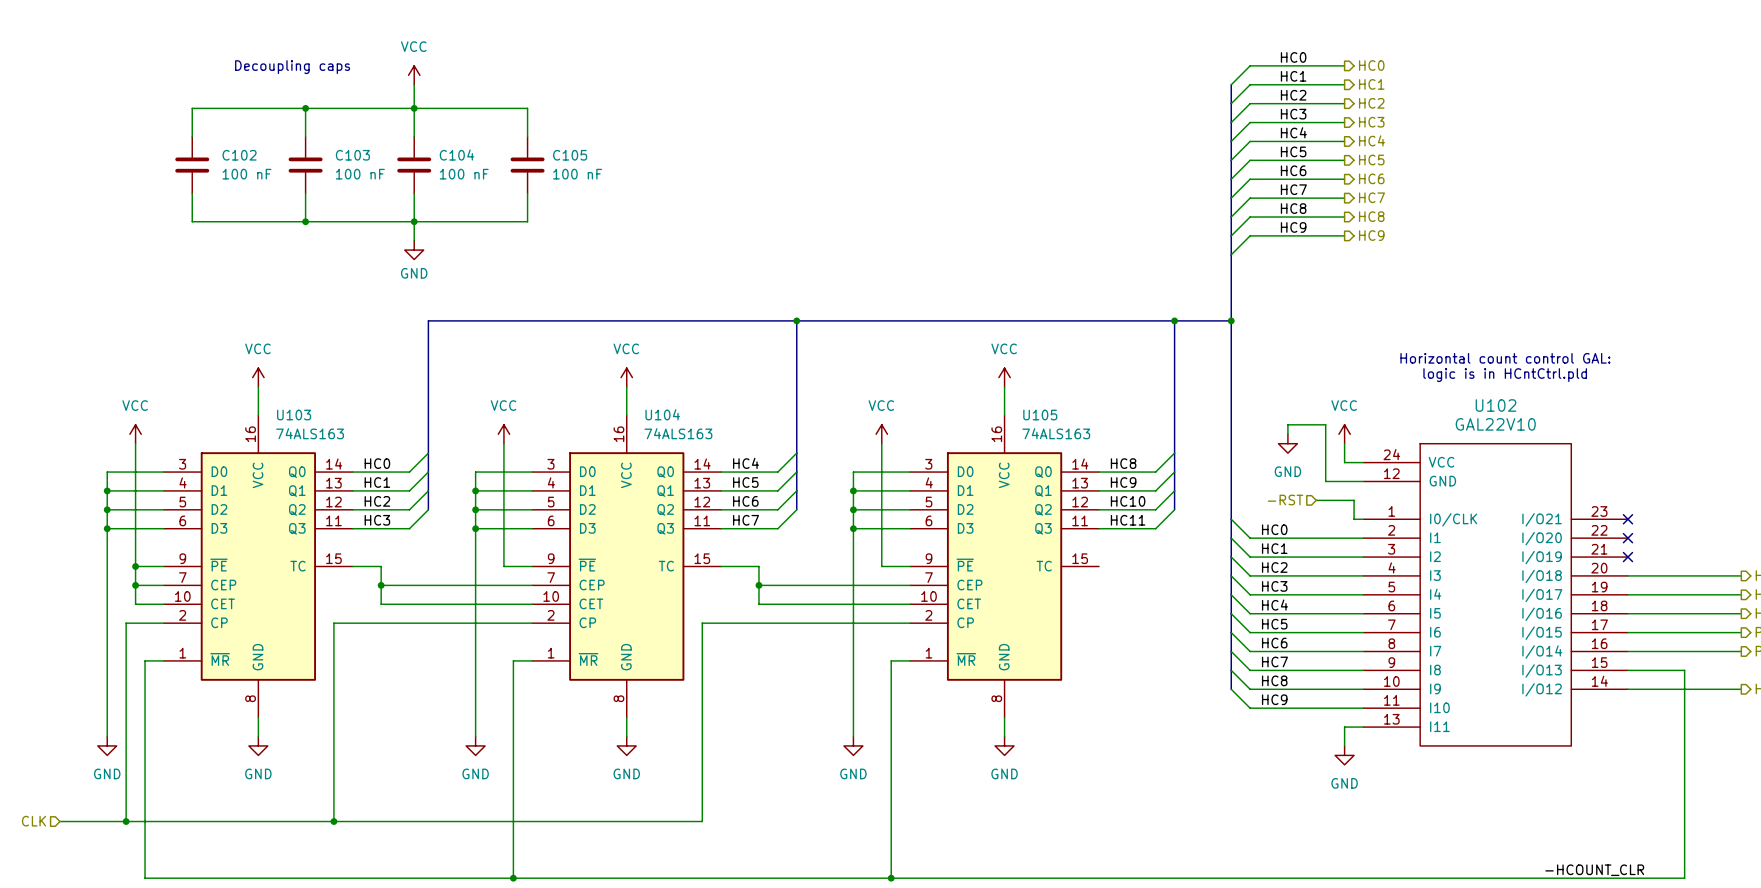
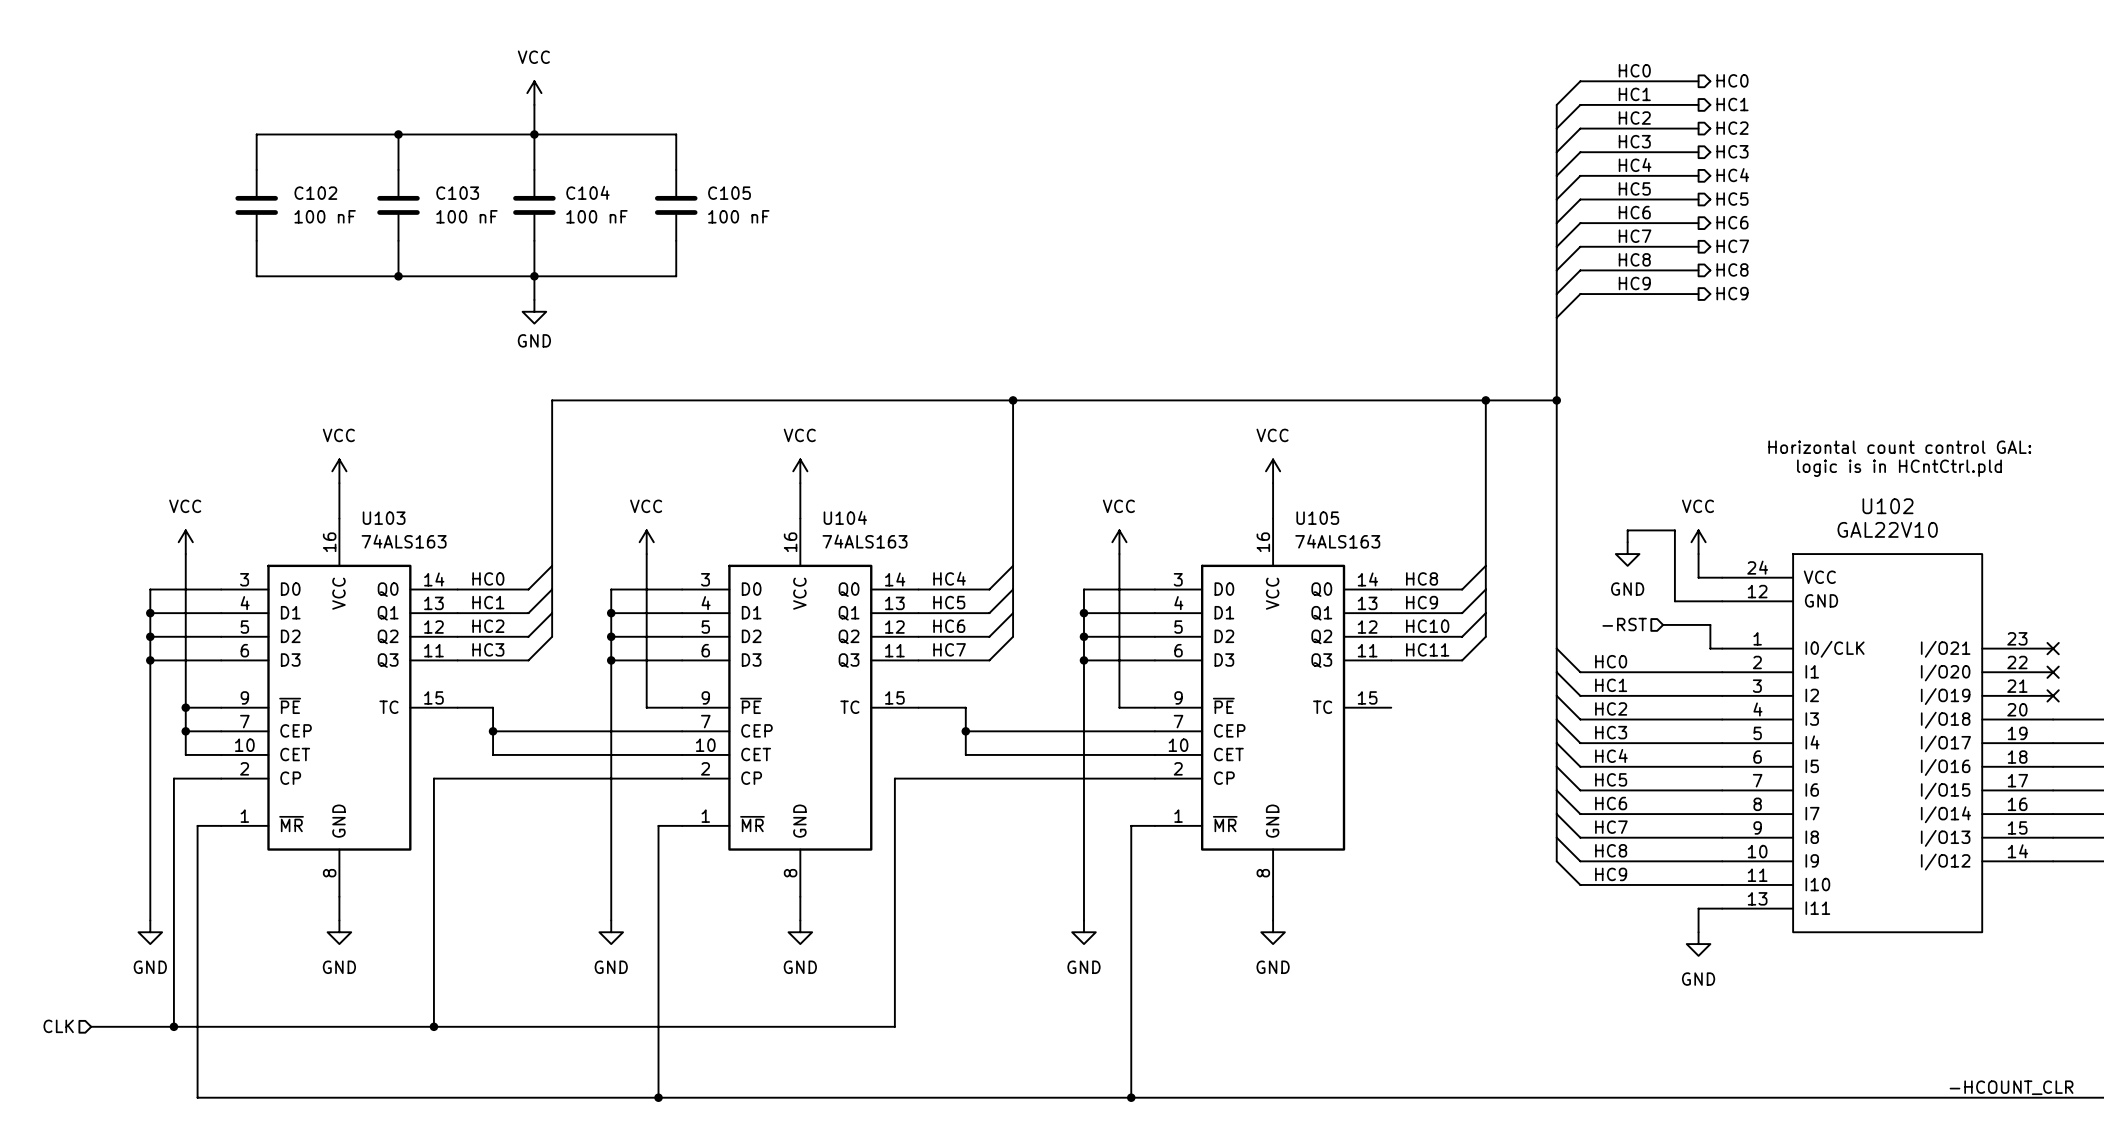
text: Decoupling caps (292, 67) -> none

